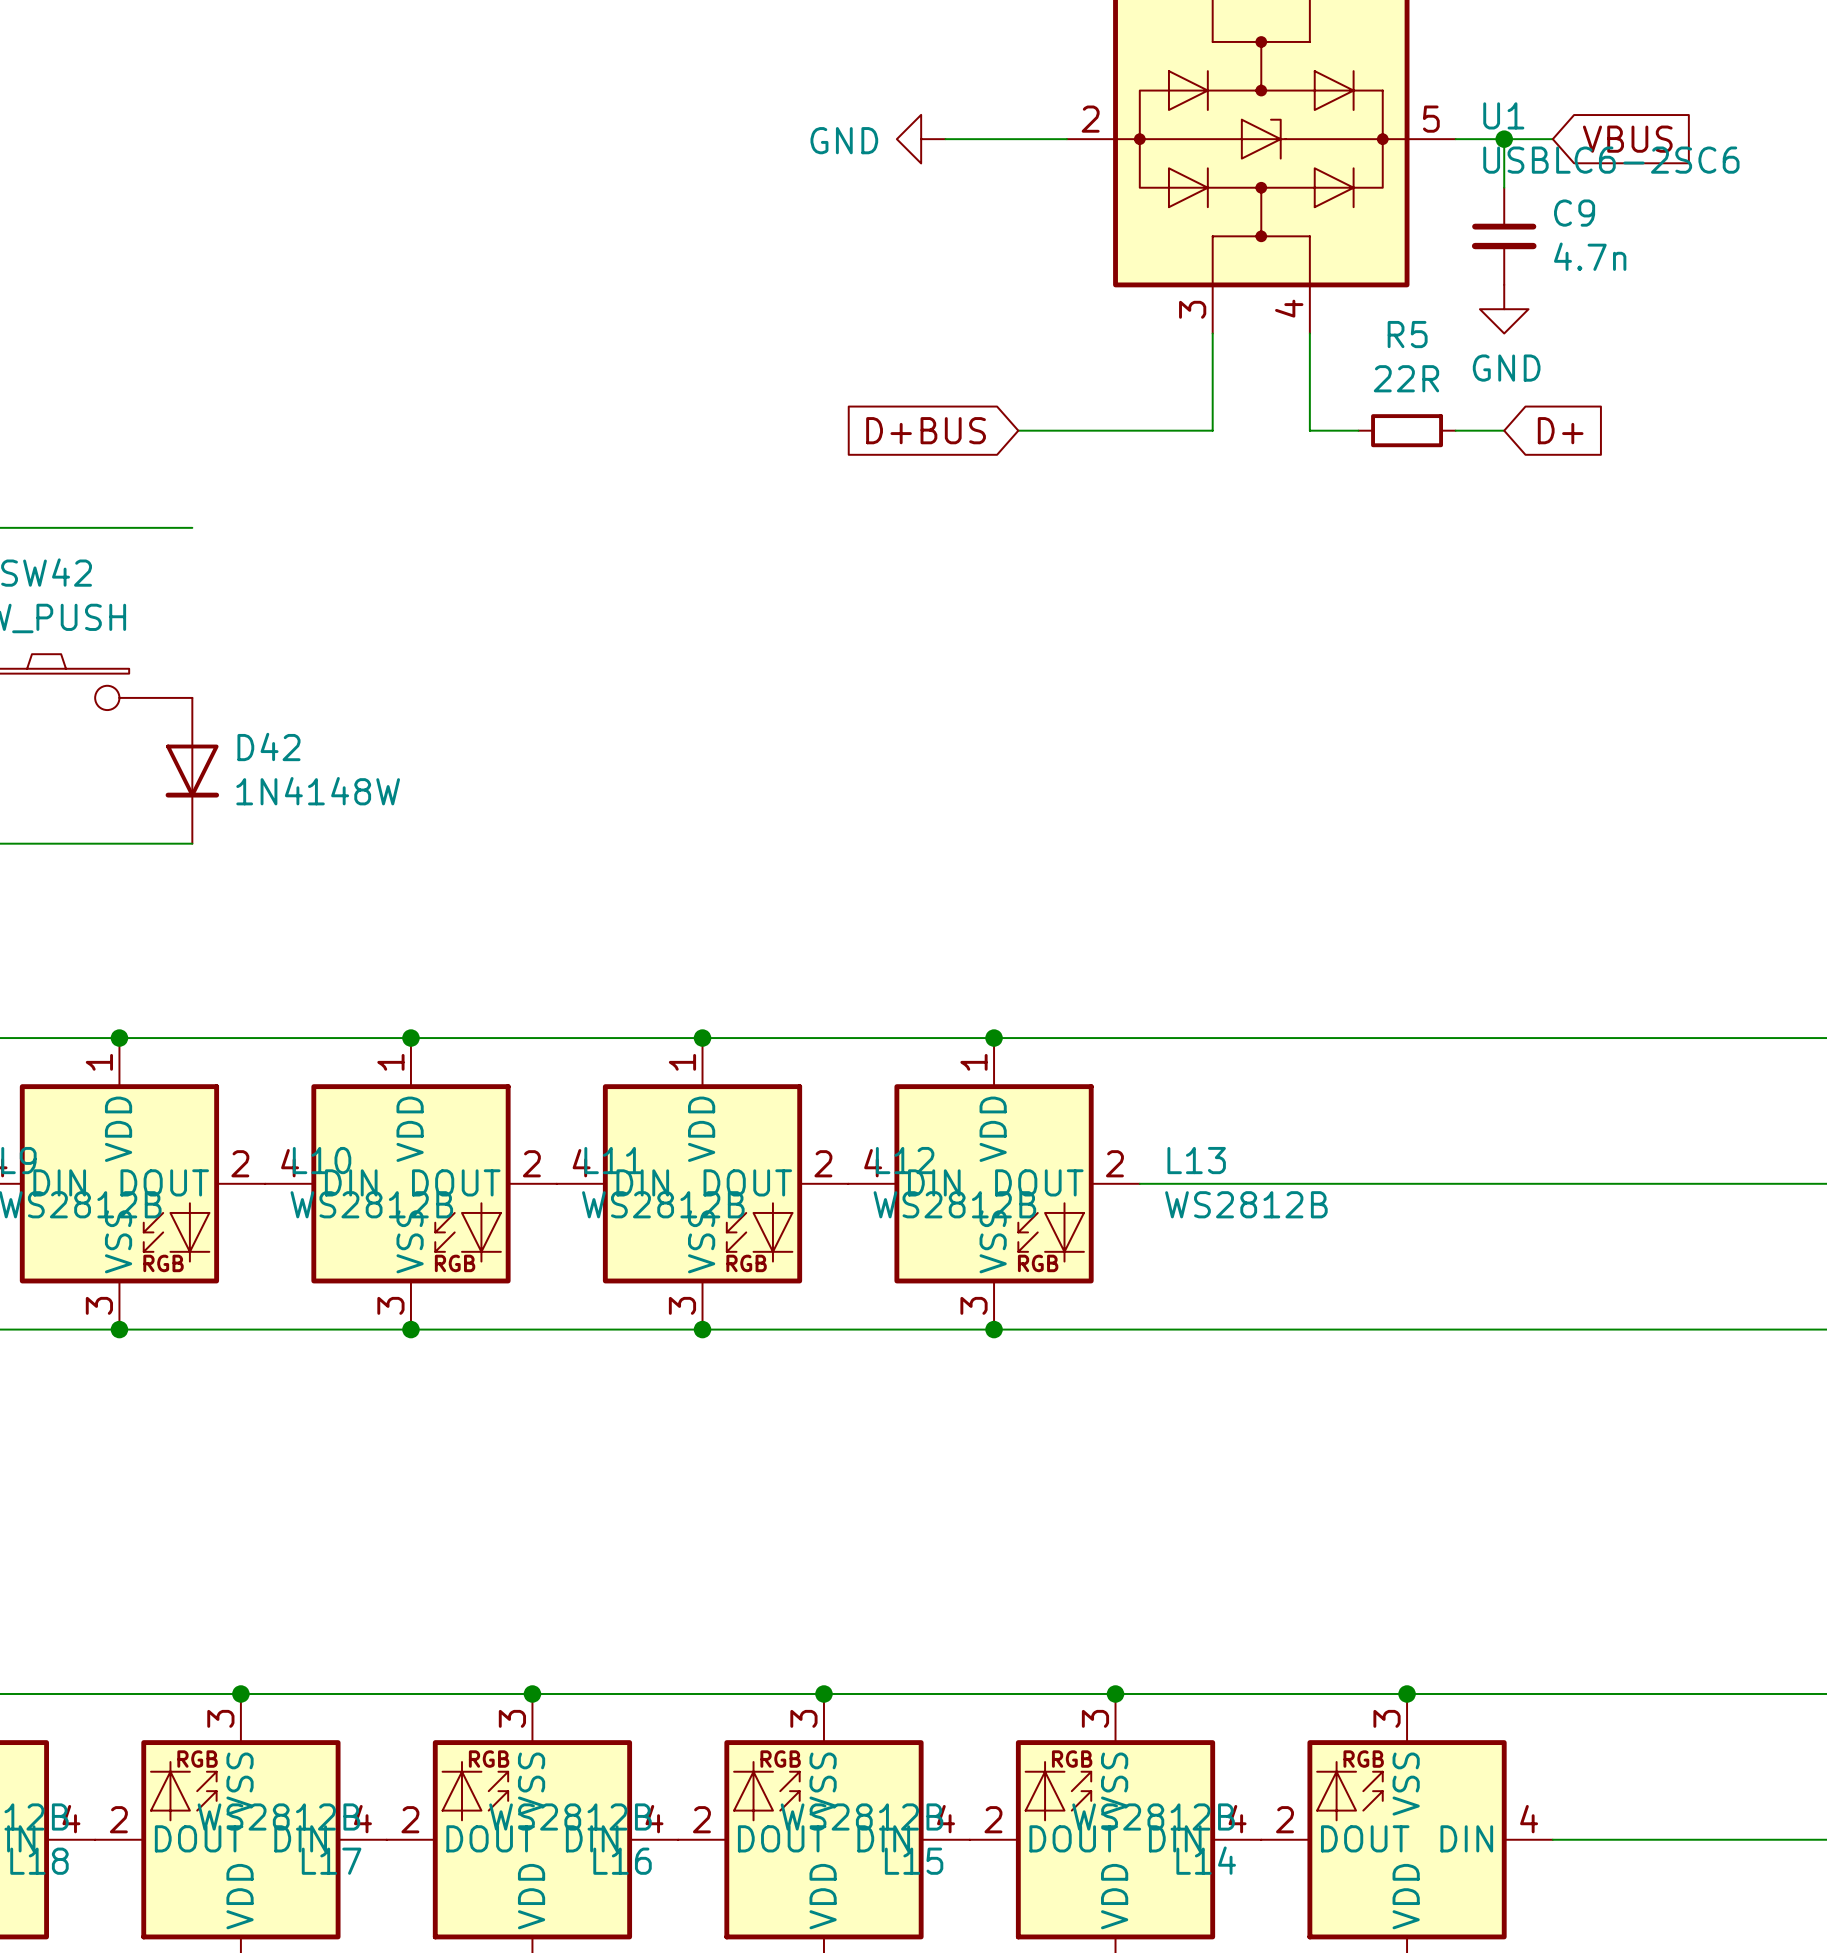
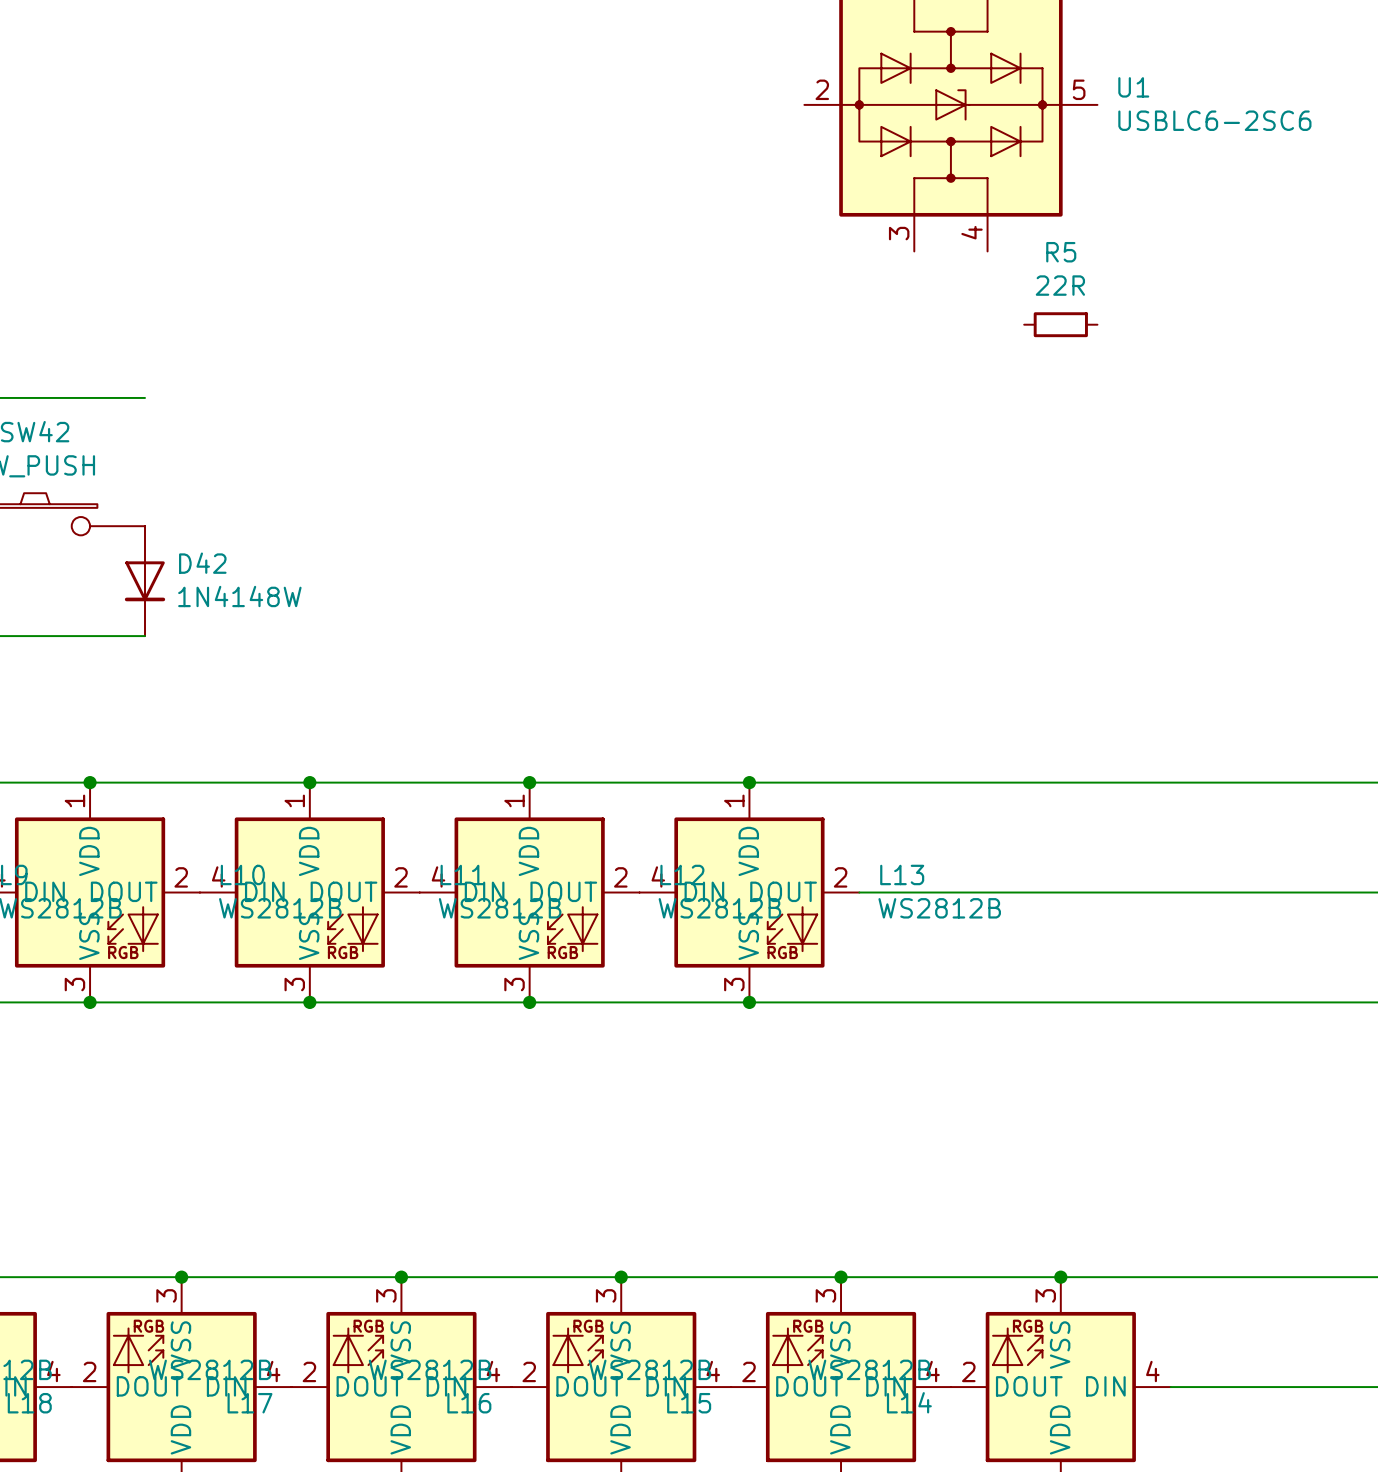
power symbol: GND (921, 139) -> none
wire: (945, 139) (1066, 139) -> none
wire: (1455, 139) (1552, 139) -> none
wire: (1504, 139) (1504, 187) -> none
junction: (1504, 139) -> none
global label: VBUS (1627, 139) -> none
C9: 4.7n (1504, 236) -> none
power symbol: GND (1504, 309) -> none
wire: (1212, 333) (1212, 430) (1018, 430) -> none
wire: (1309, 333) (1309, 430) (1358, 430) -> none
global label: D+BUS (926, 430) -> none
wire: (1455, 430) (1504, 430) -> none
global label: D+ (1560, 430) -> none

